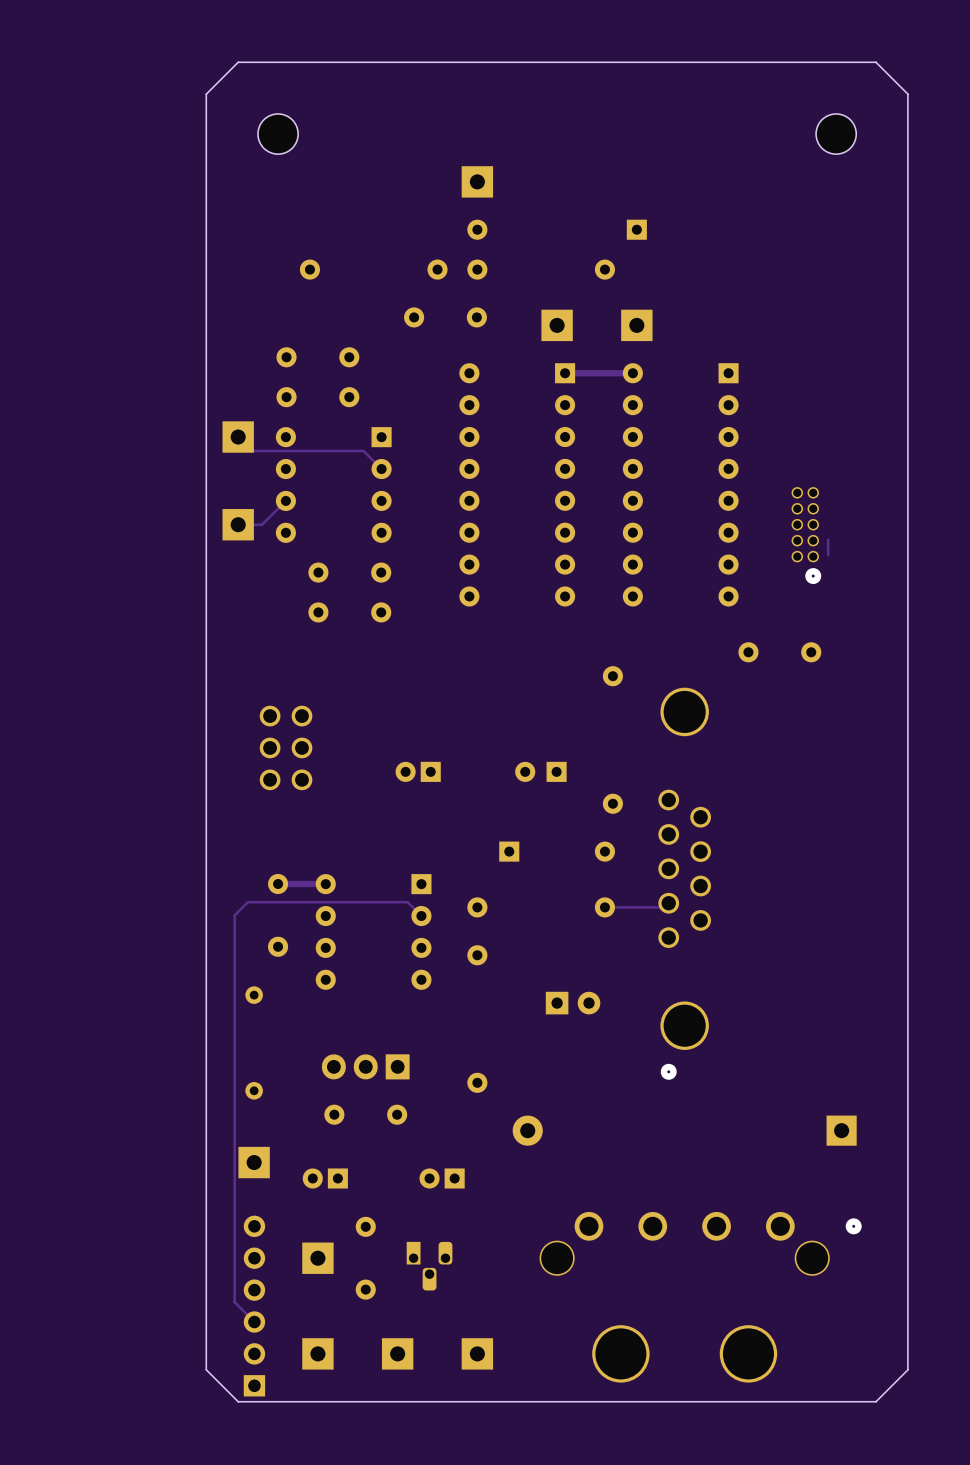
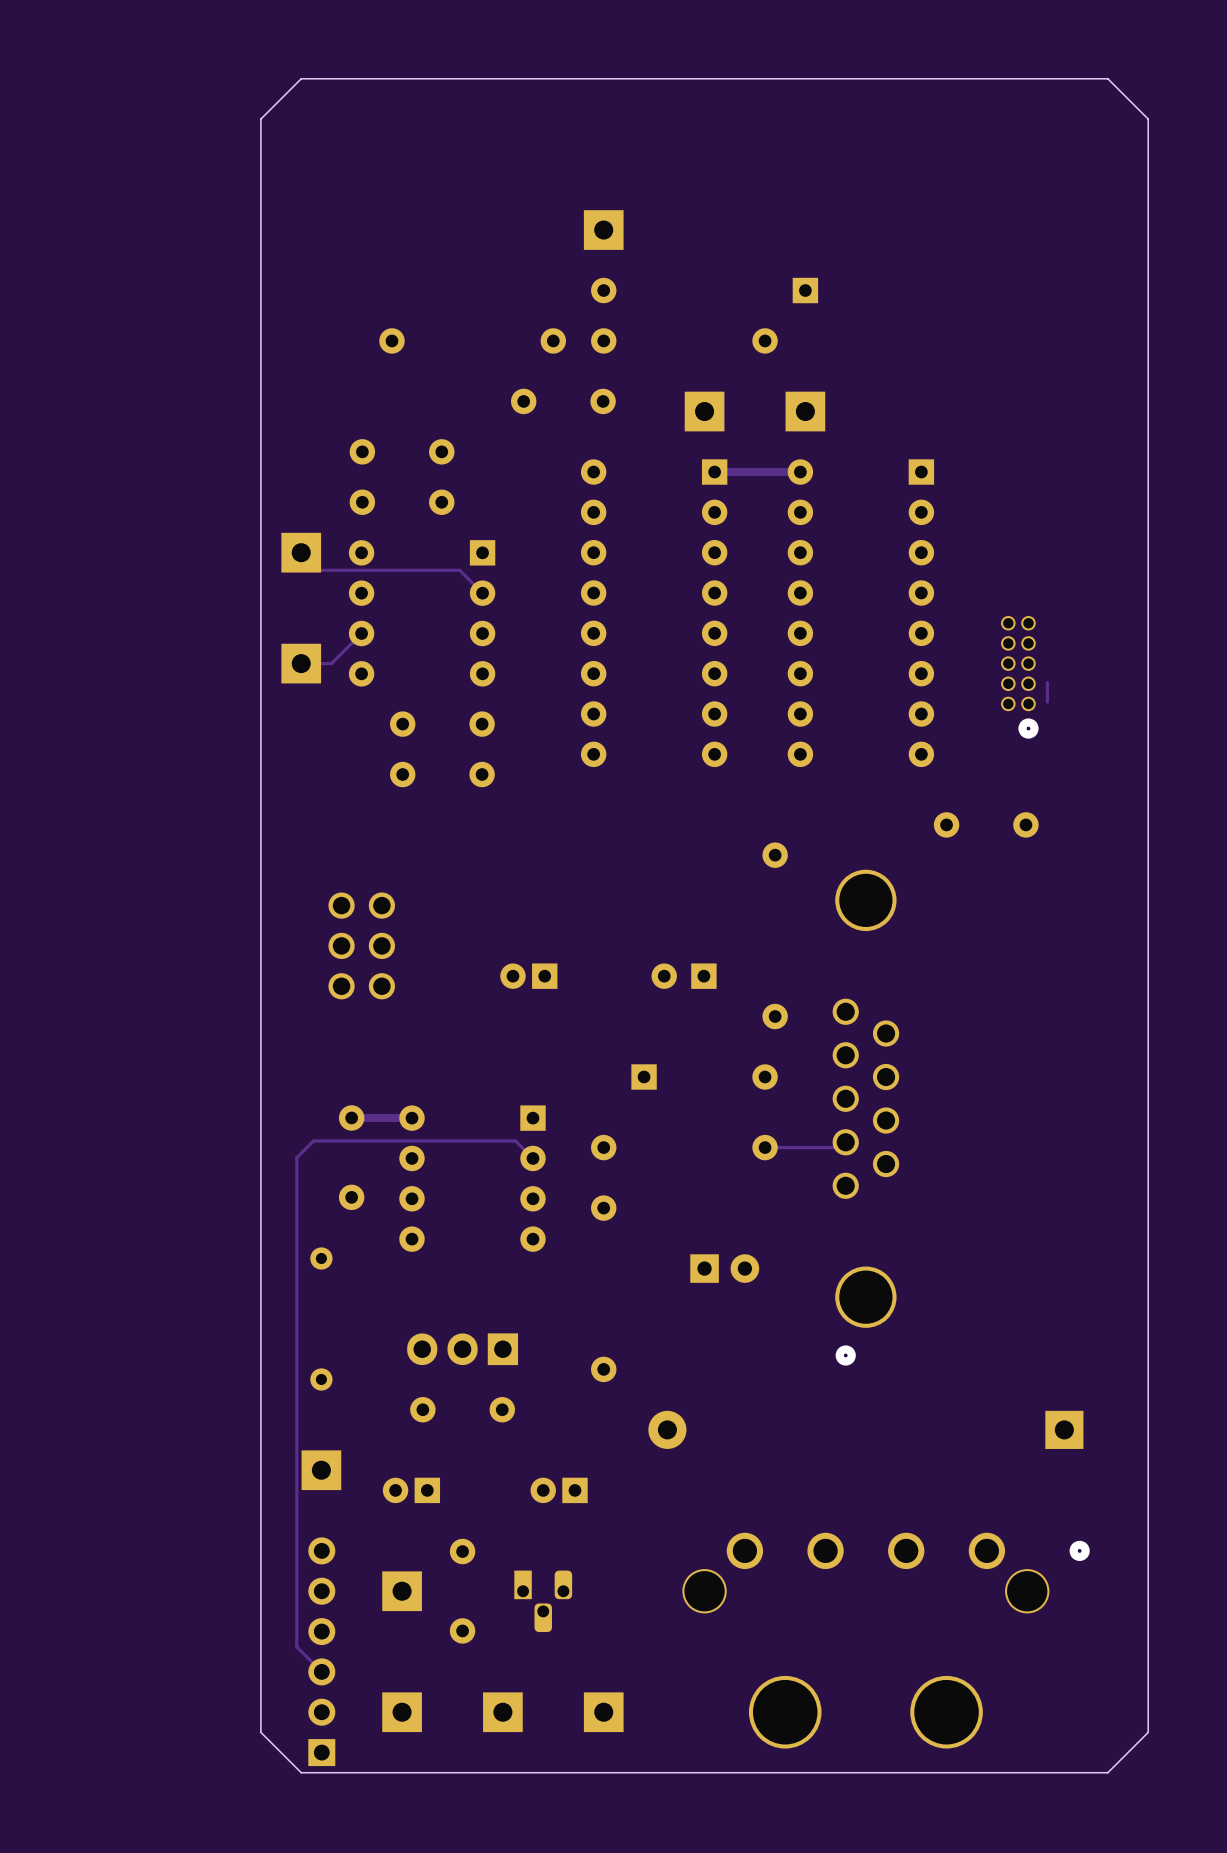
part: (278, 134) -> none
part: (836, 134) -> none

